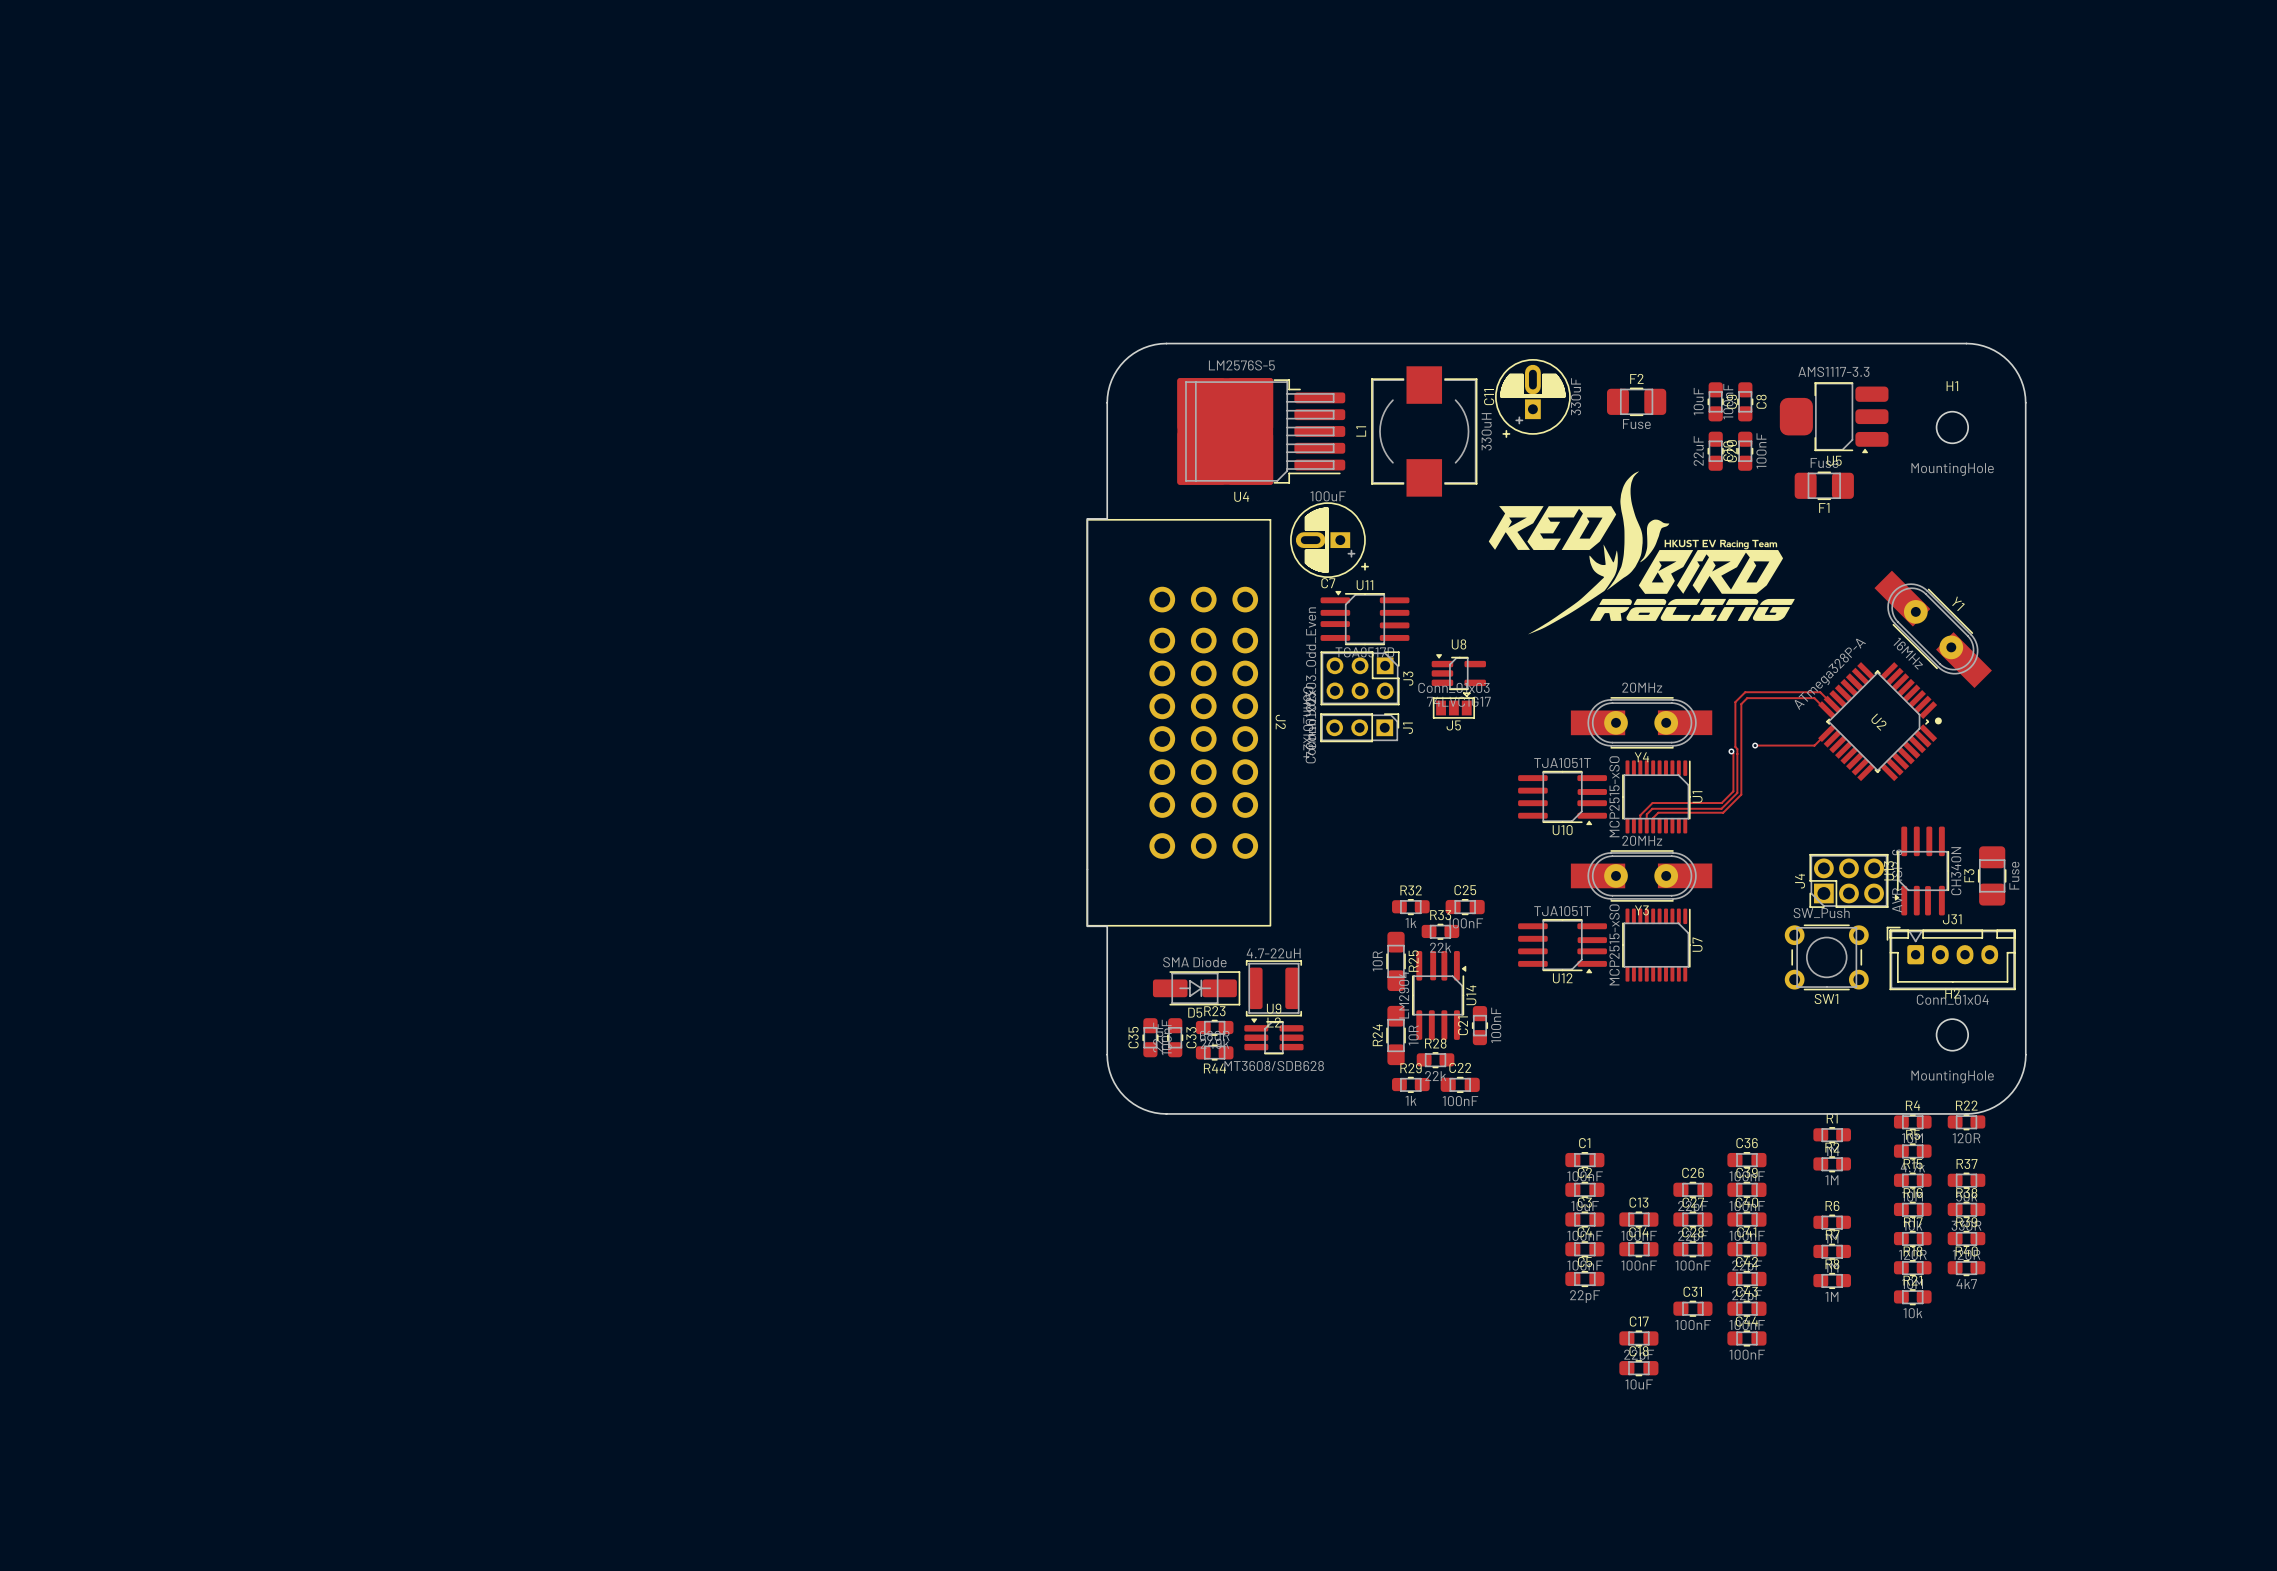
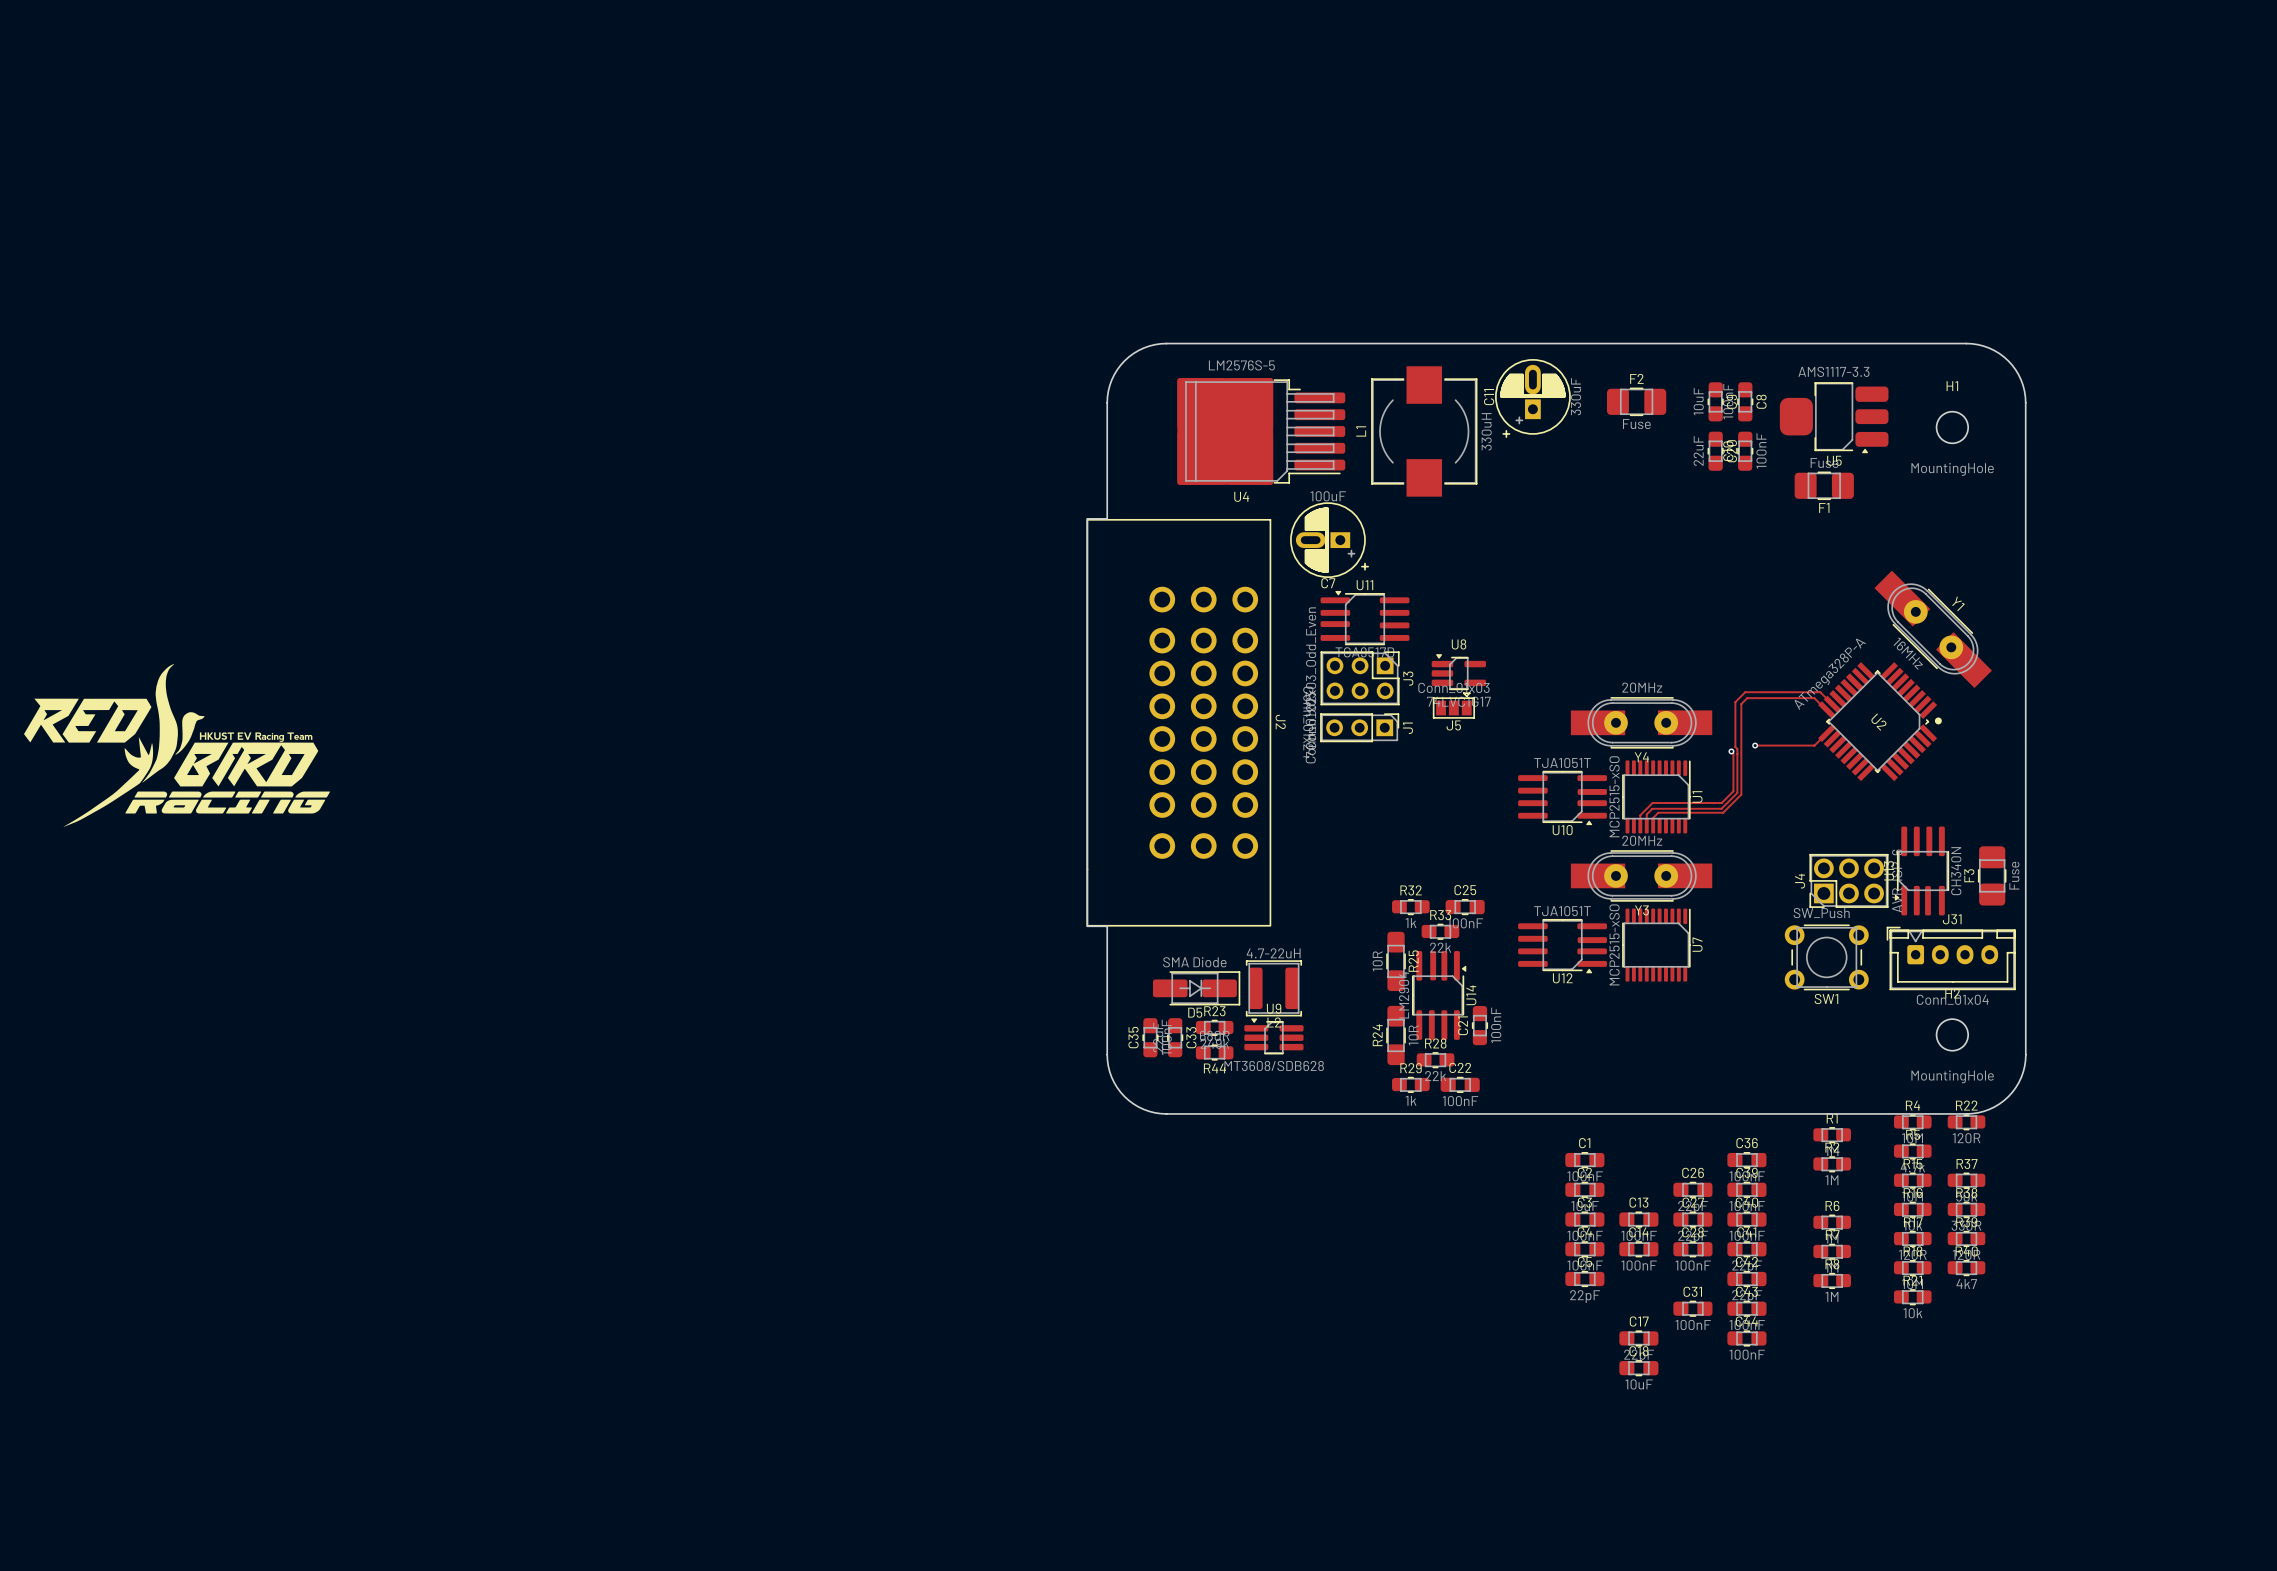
drawing: [1488, 471, 1795, 635] -> none
drawing: none -> [24, 664, 330, 827]

